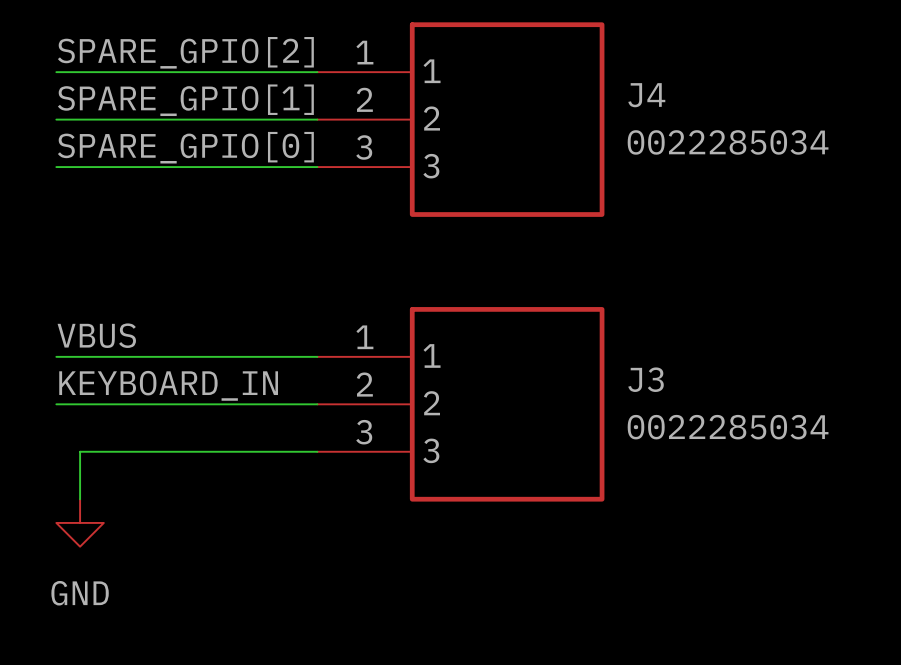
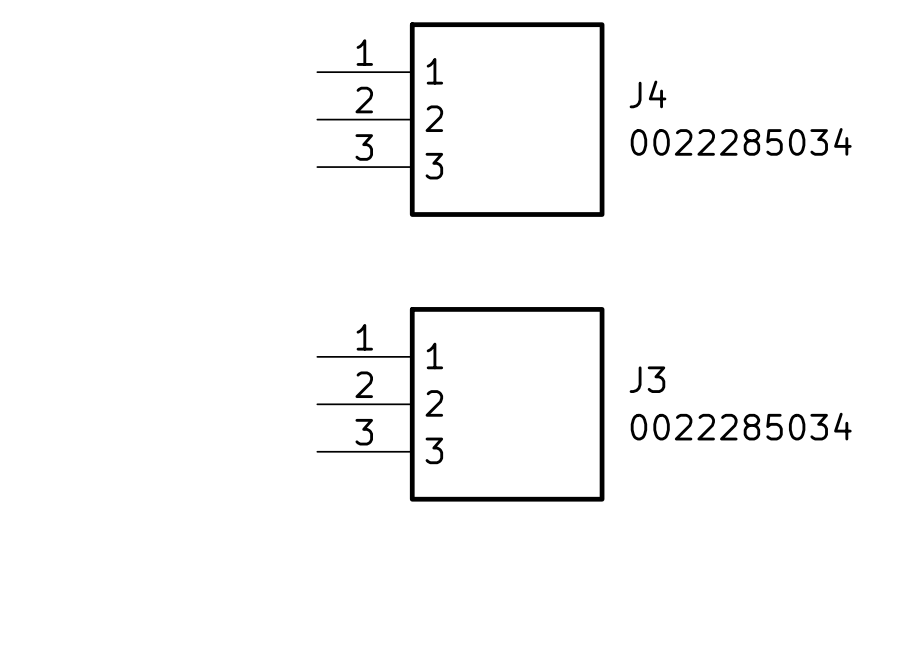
label: SPARE_GPIO[2] (185, 52) -> none
wire: (56, 72) (317, 72) -> none
label: SPARE_GPIO[1] (185, 100) -> none
wire: (56, 119) (317, 119) -> none
label: SPARE_GPIO[0] (185, 147) -> none
wire: (56, 167) (317, 167) -> none
label: VBUS (96, 335) -> none
wire: (56, 356) (317, 356) -> none
label: KEYBOARD_IN (168, 385) -> none
wire: (56, 404) (317, 404) -> none
wire: (317, 451) (80, 451) (80, 499) -> none
power symbol: GND (80, 522) -> none

